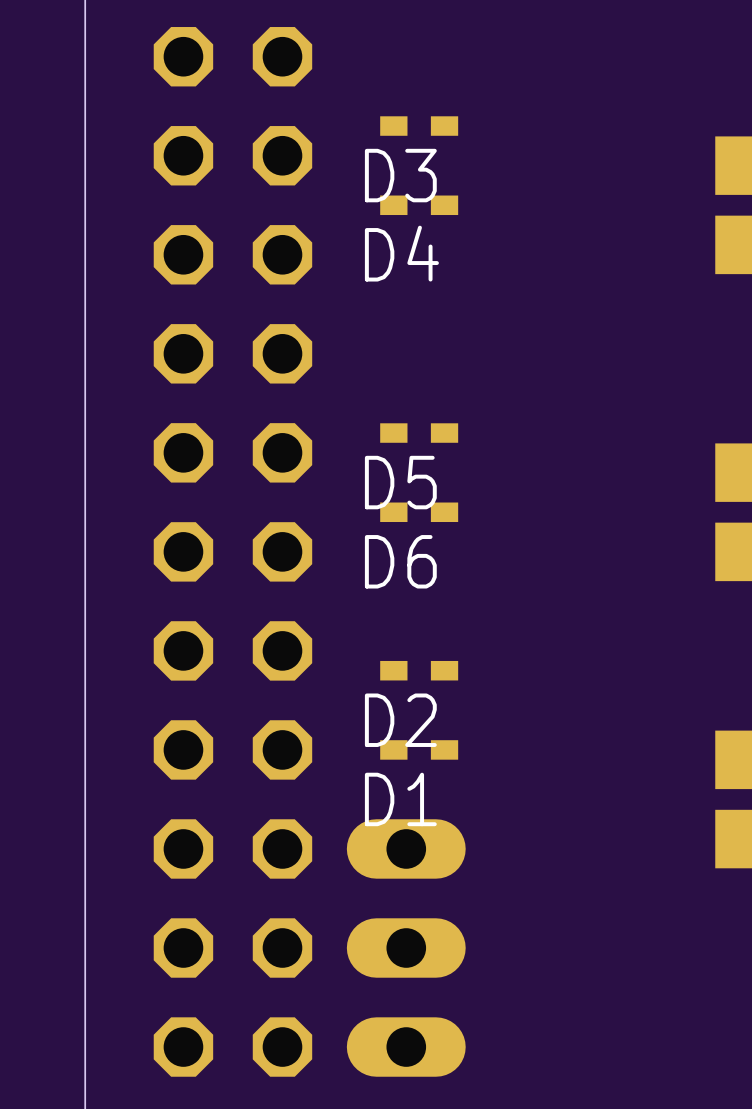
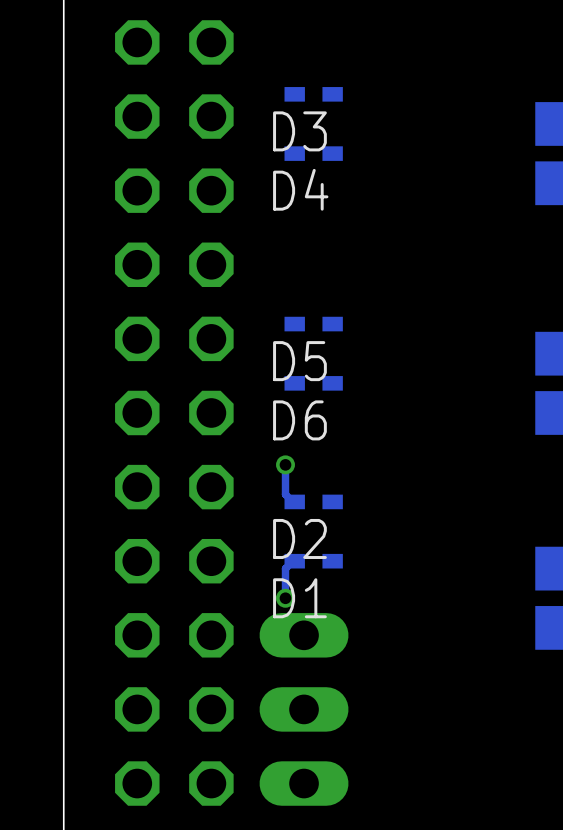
track: none -> (285, 464) (285, 494) (294, 501)
via: none -> (285, 464)
track: none -> (294, 561) (285, 568) (285, 598)
via: none -> (285, 598)

